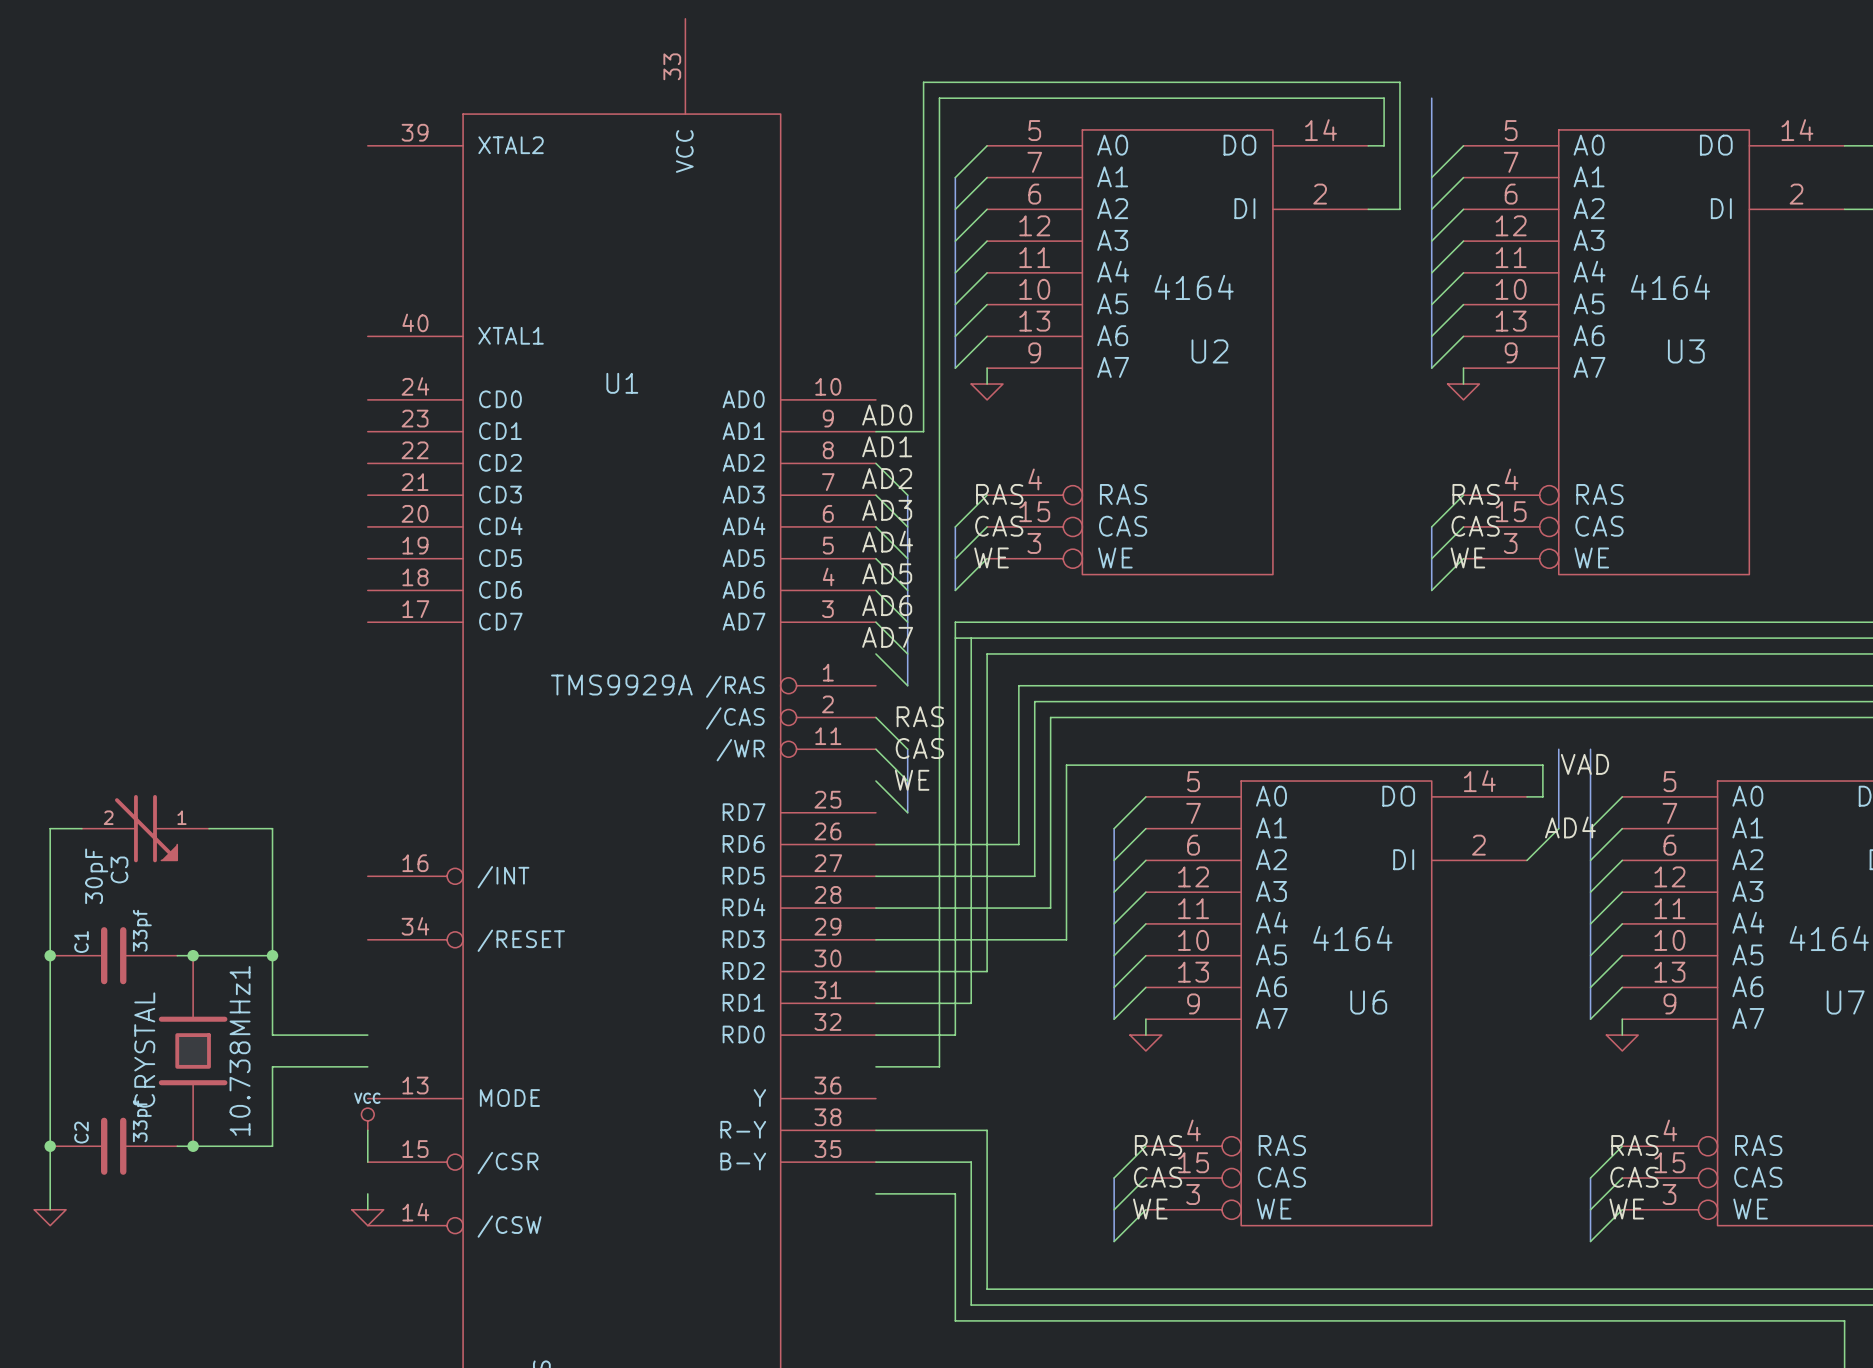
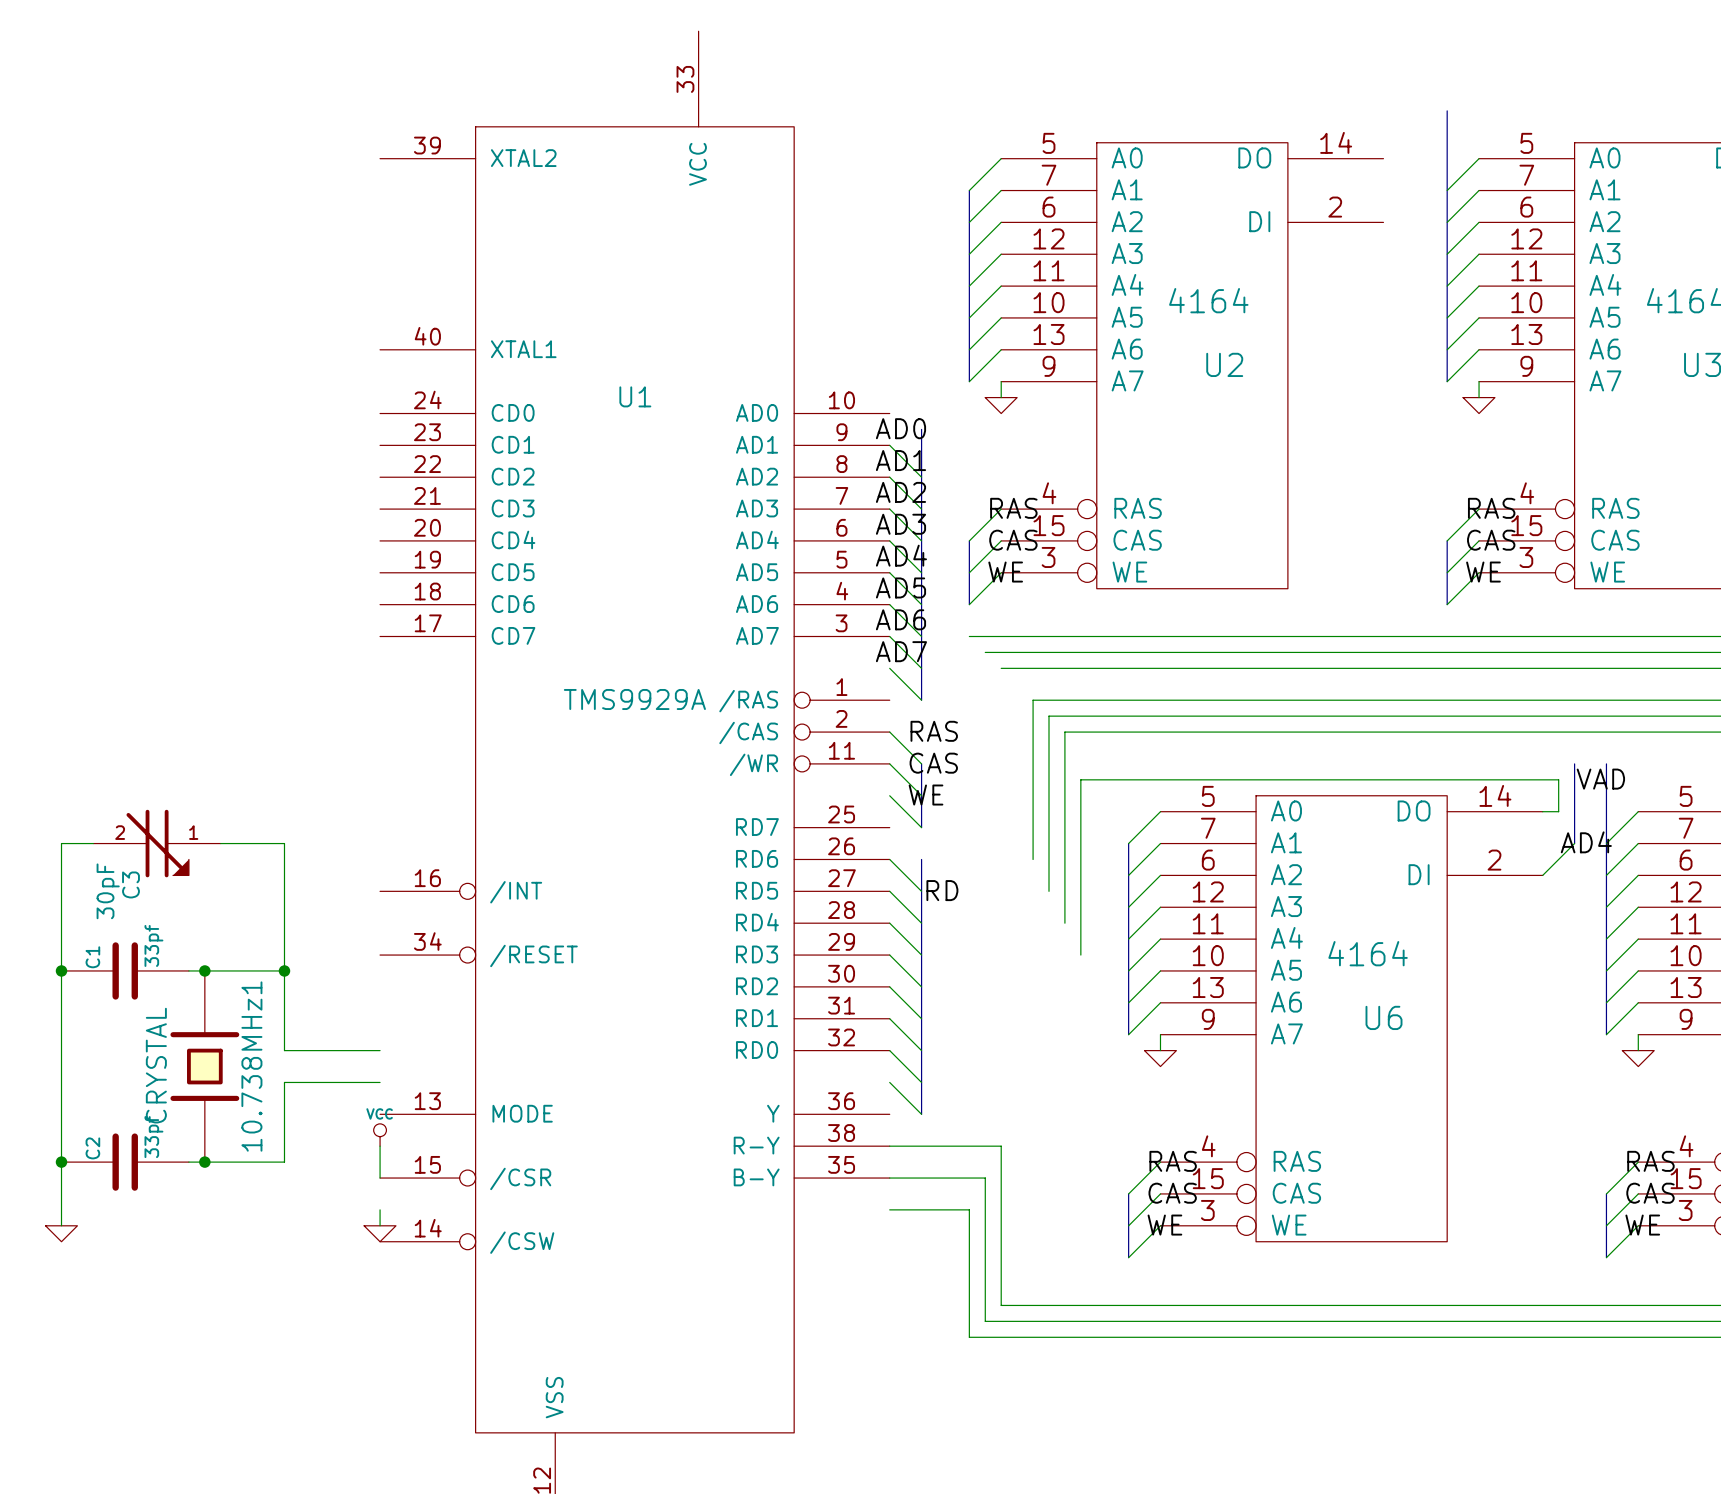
wire: (1368, 145) (1384, 145) (1384, 98) (939, 98) (939, 1066) (875, 1066) -> (921, 1114) (889, 1082)
wire: (1368, 209) (1399, 209) (1399, 82) (923, 82) (923, 431) (875, 431) -> (921, 477) (889, 445)
bus: none -> (921, 429) (921, 509)
wire: (955, 622) (955, 1035) (875, 1035) -> (921, 1082) (889, 1050)
wire: (955, 638) (971, 638) (971, 1003) (875, 1003) -> (921, 1050) (889, 1018)
wire: (987, 653) (987, 971) (875, 971) -> (921, 1018) (889, 986)
wire: (875, 844) (1018, 844) -> (889, 859) (921, 891)
bus: none -> (921, 859) (921, 1114)
label: none -> RD (942, 890)
wire: (875, 876) (1034, 876) -> (889, 891) (921, 923)
wire: (875, 908) (1050, 908) -> (889, 923) (921, 955)
wire: (875, 939) (1066, 939) -> (889, 955) (921, 986)

